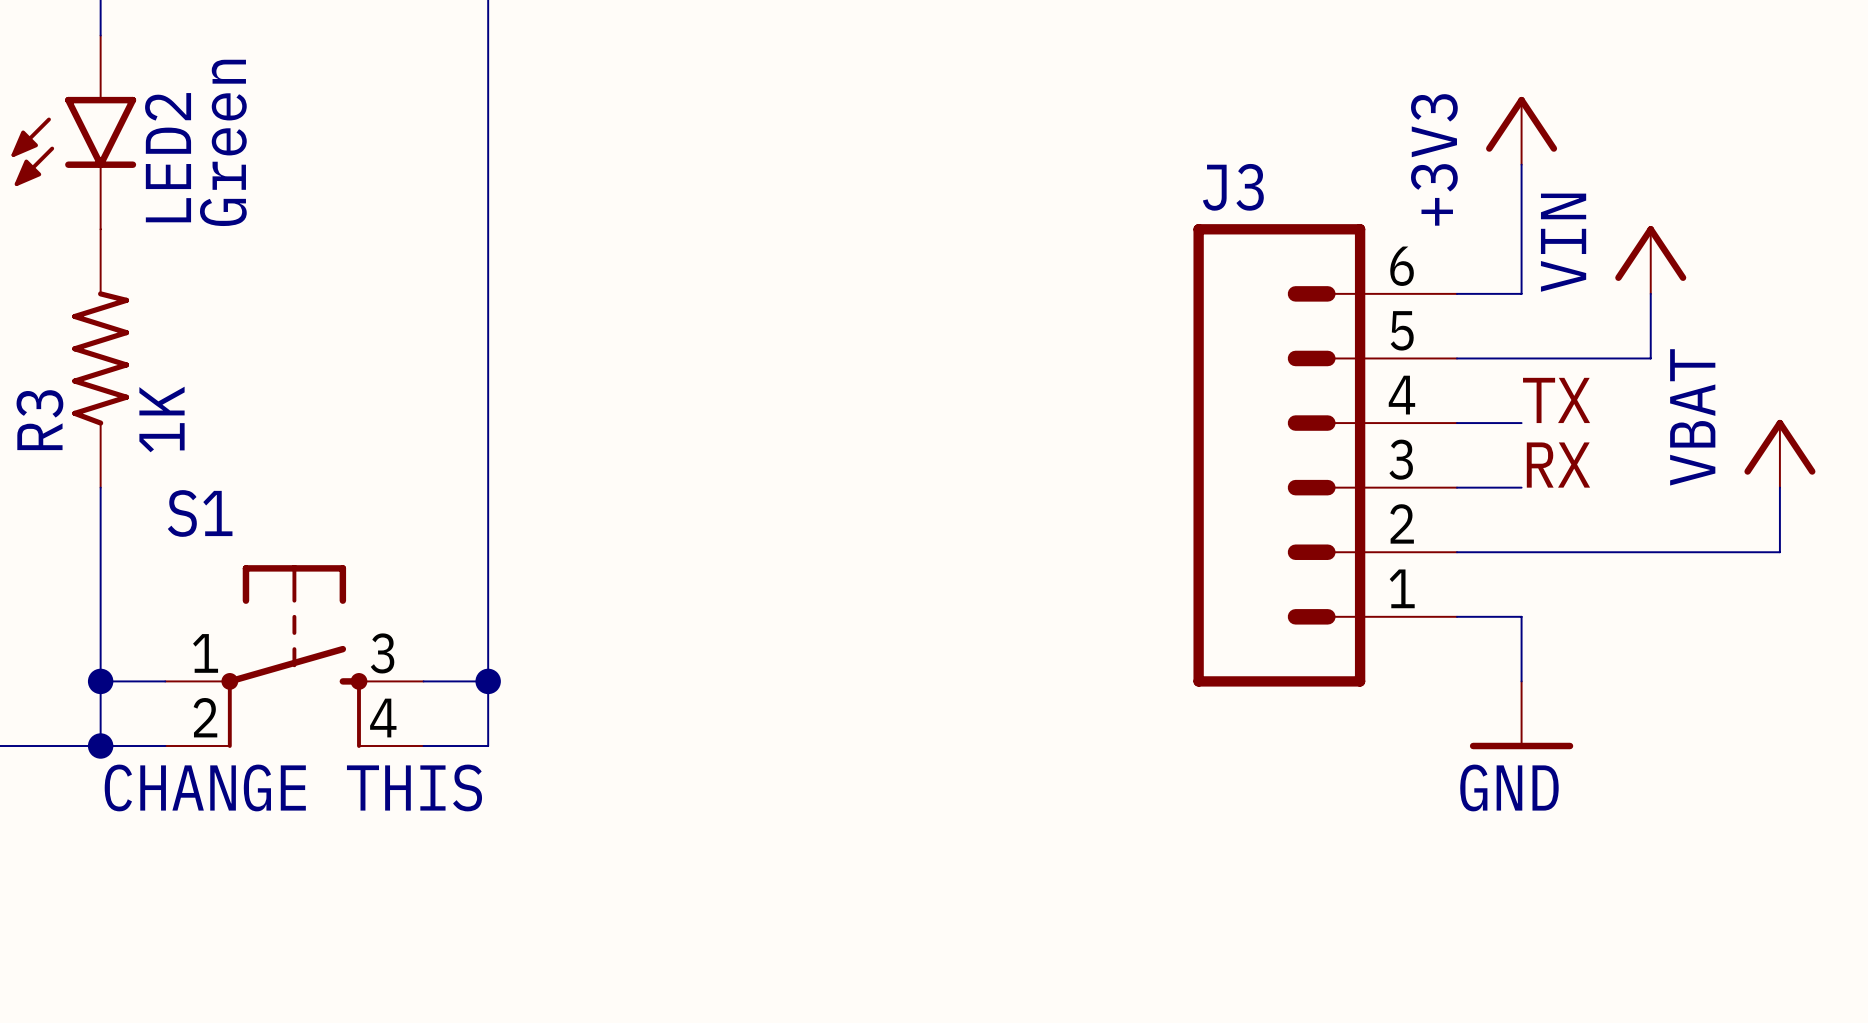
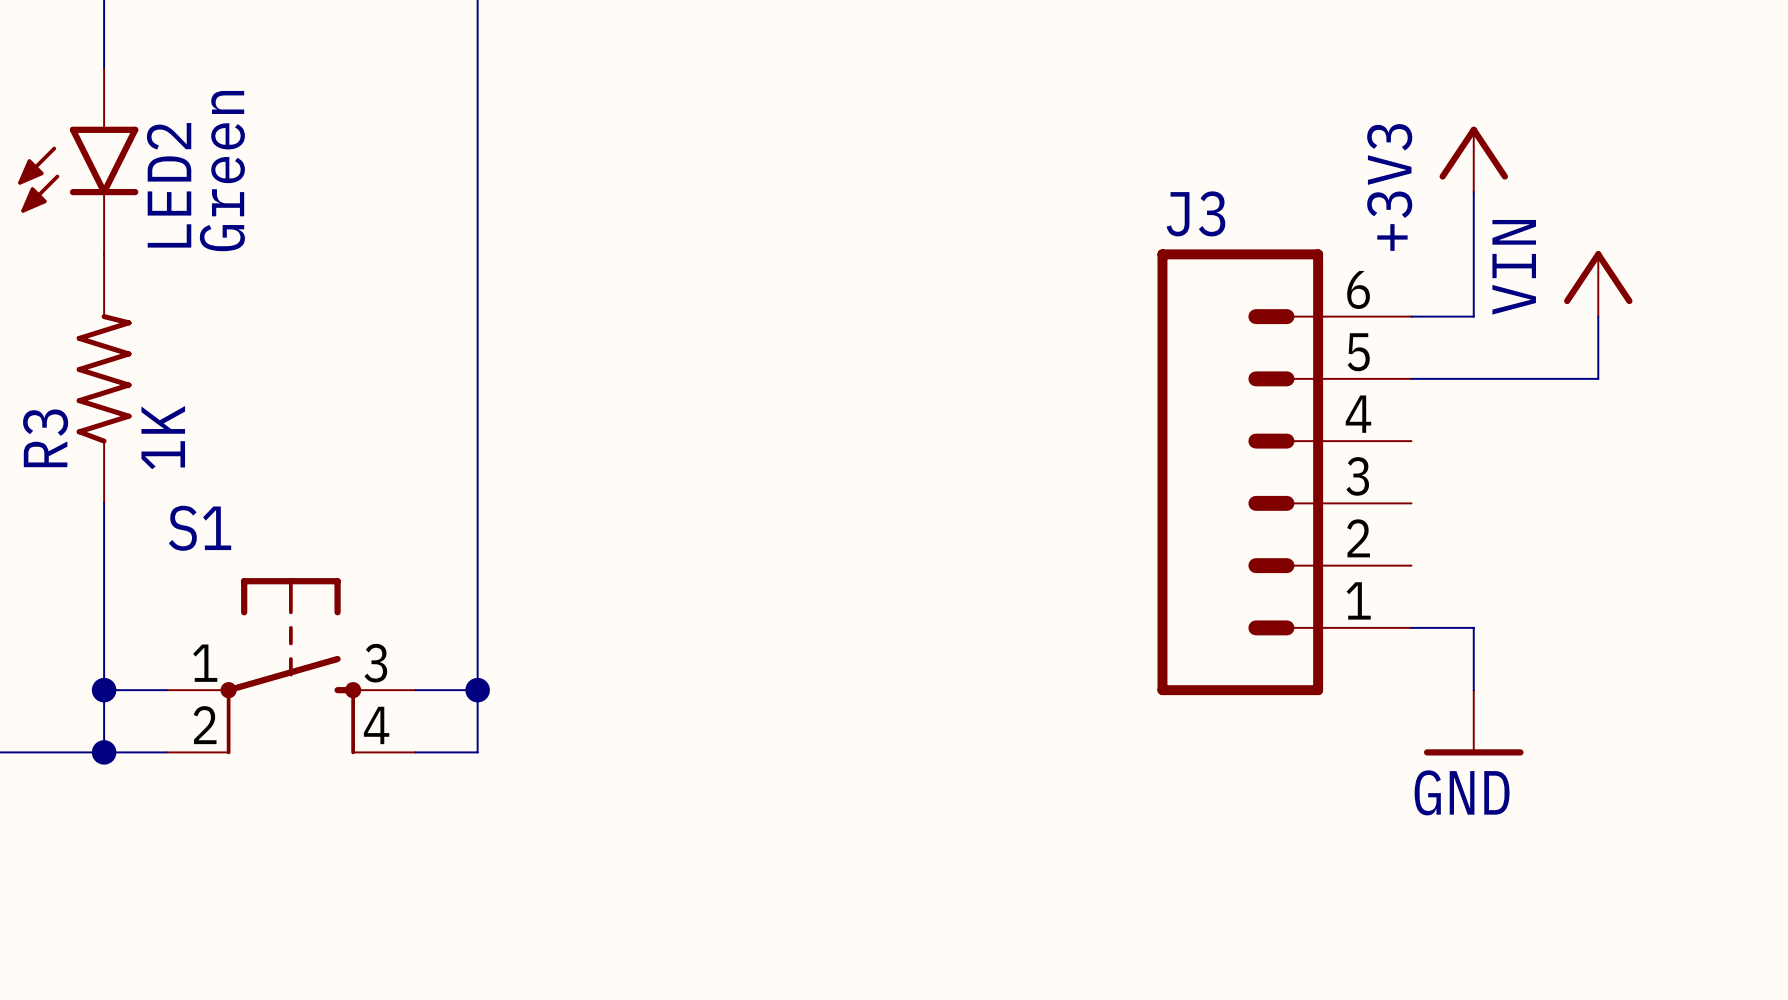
label: TX (1556, 400) -> none
wire: (1456, 423) (1521, 423) -> none
power symbol: VBAT (1779, 453) -> none
label: RX (1558, 465) -> none
wire: (1456, 487) (1521, 487) -> none
wire: (1779, 487) (1779, 552) (1456, 552) -> none
text: CHANGE THIS (293, 787) -> none

